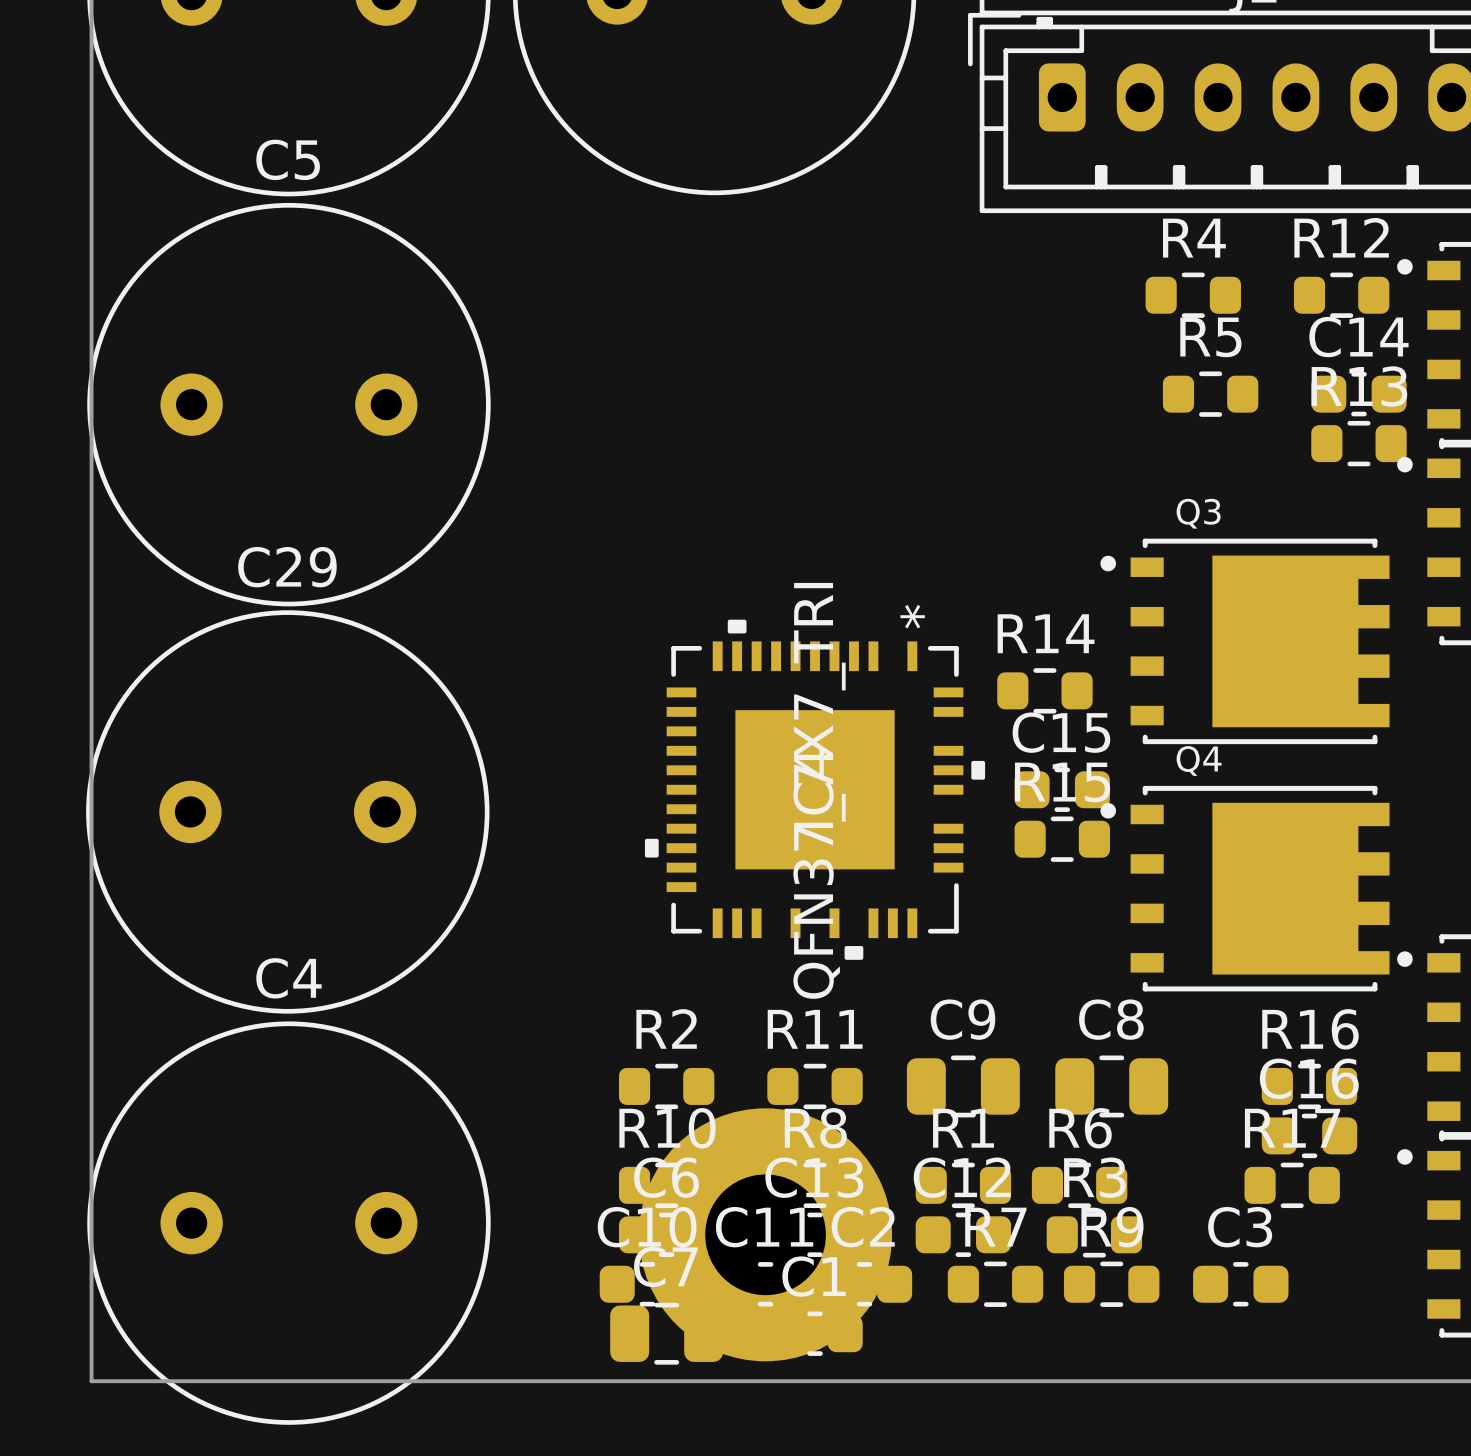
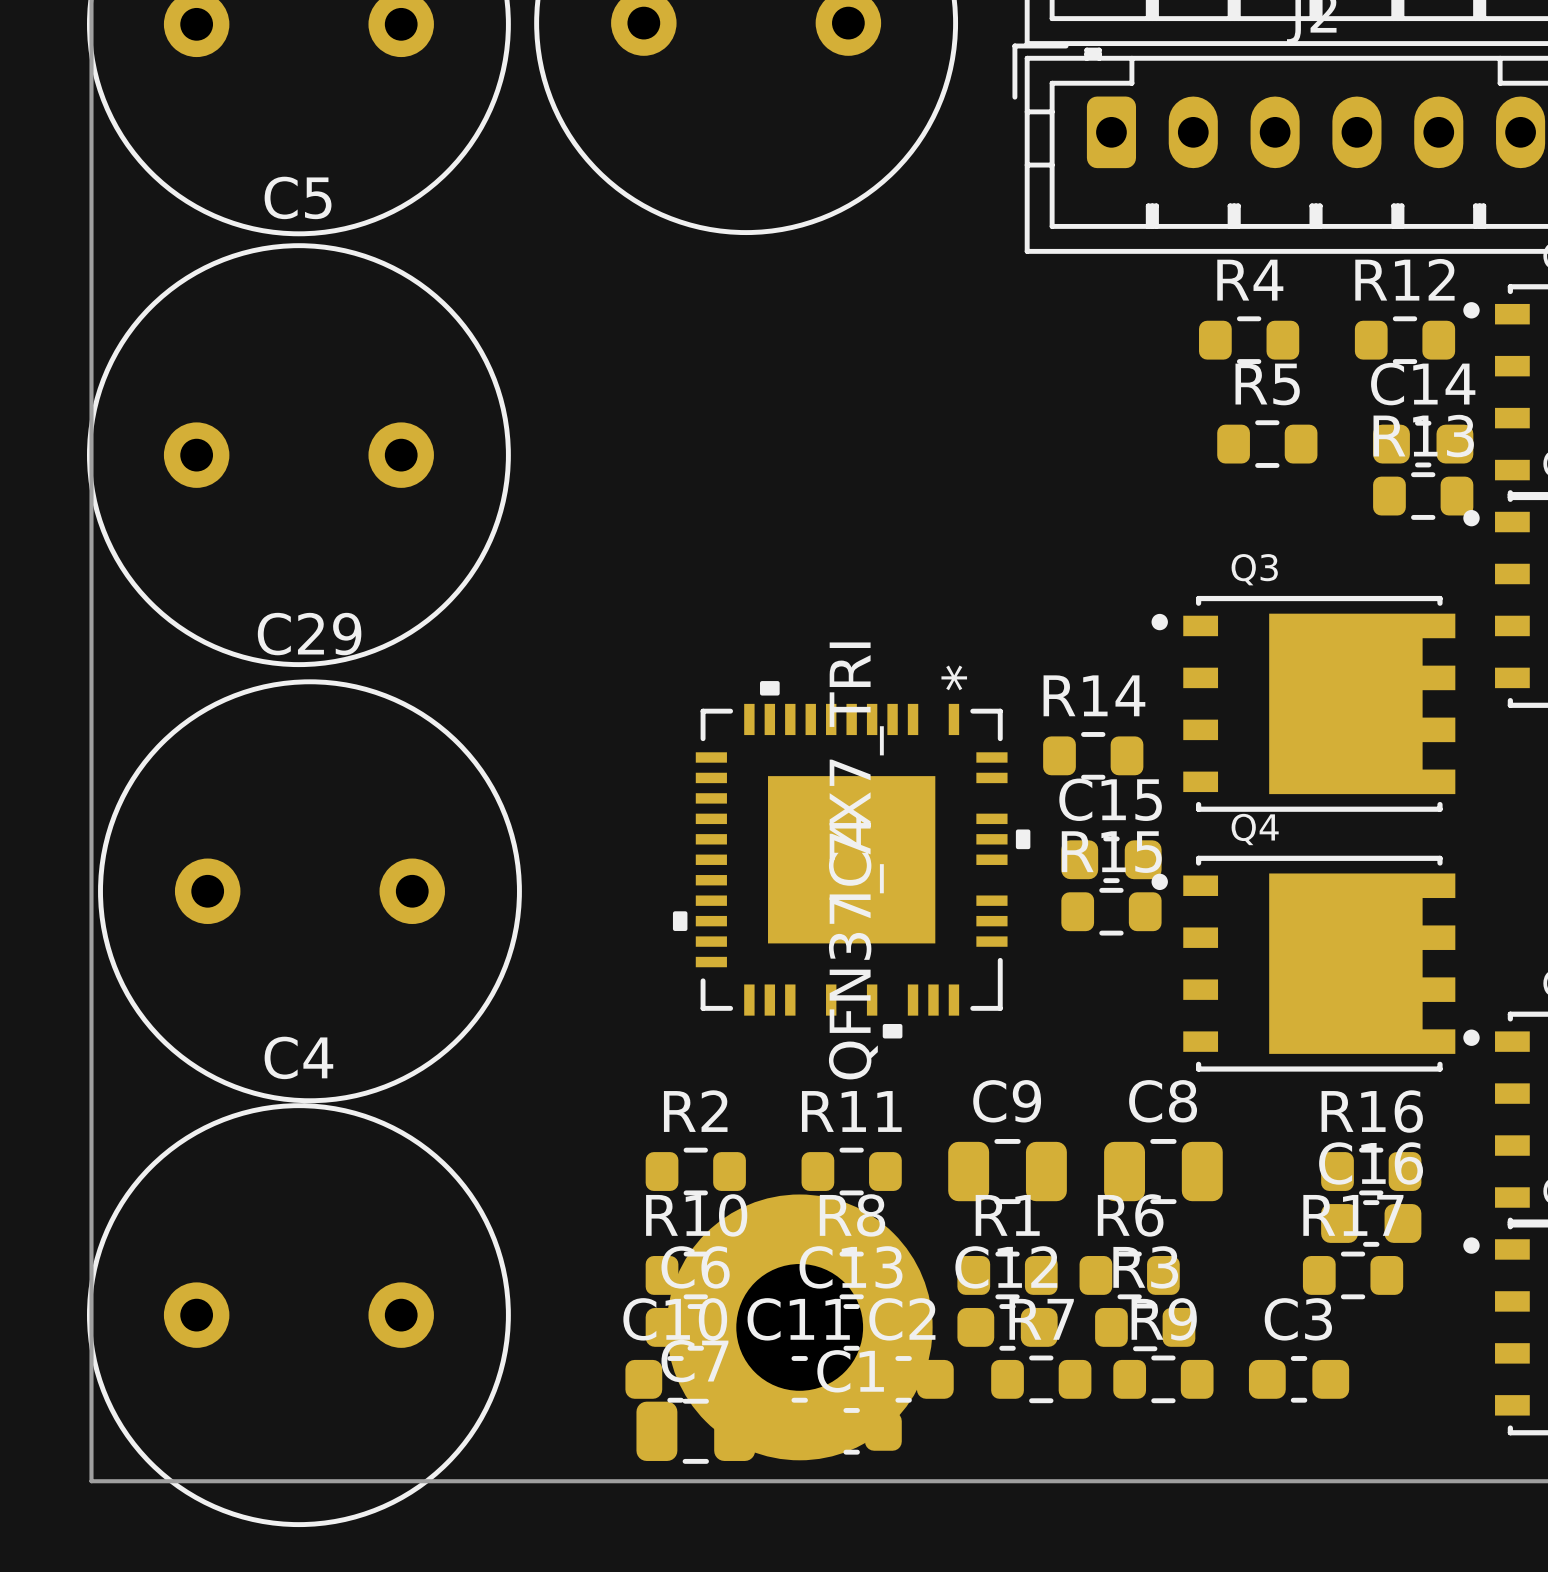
C29 position: (287, 811) -> (309, 891)

